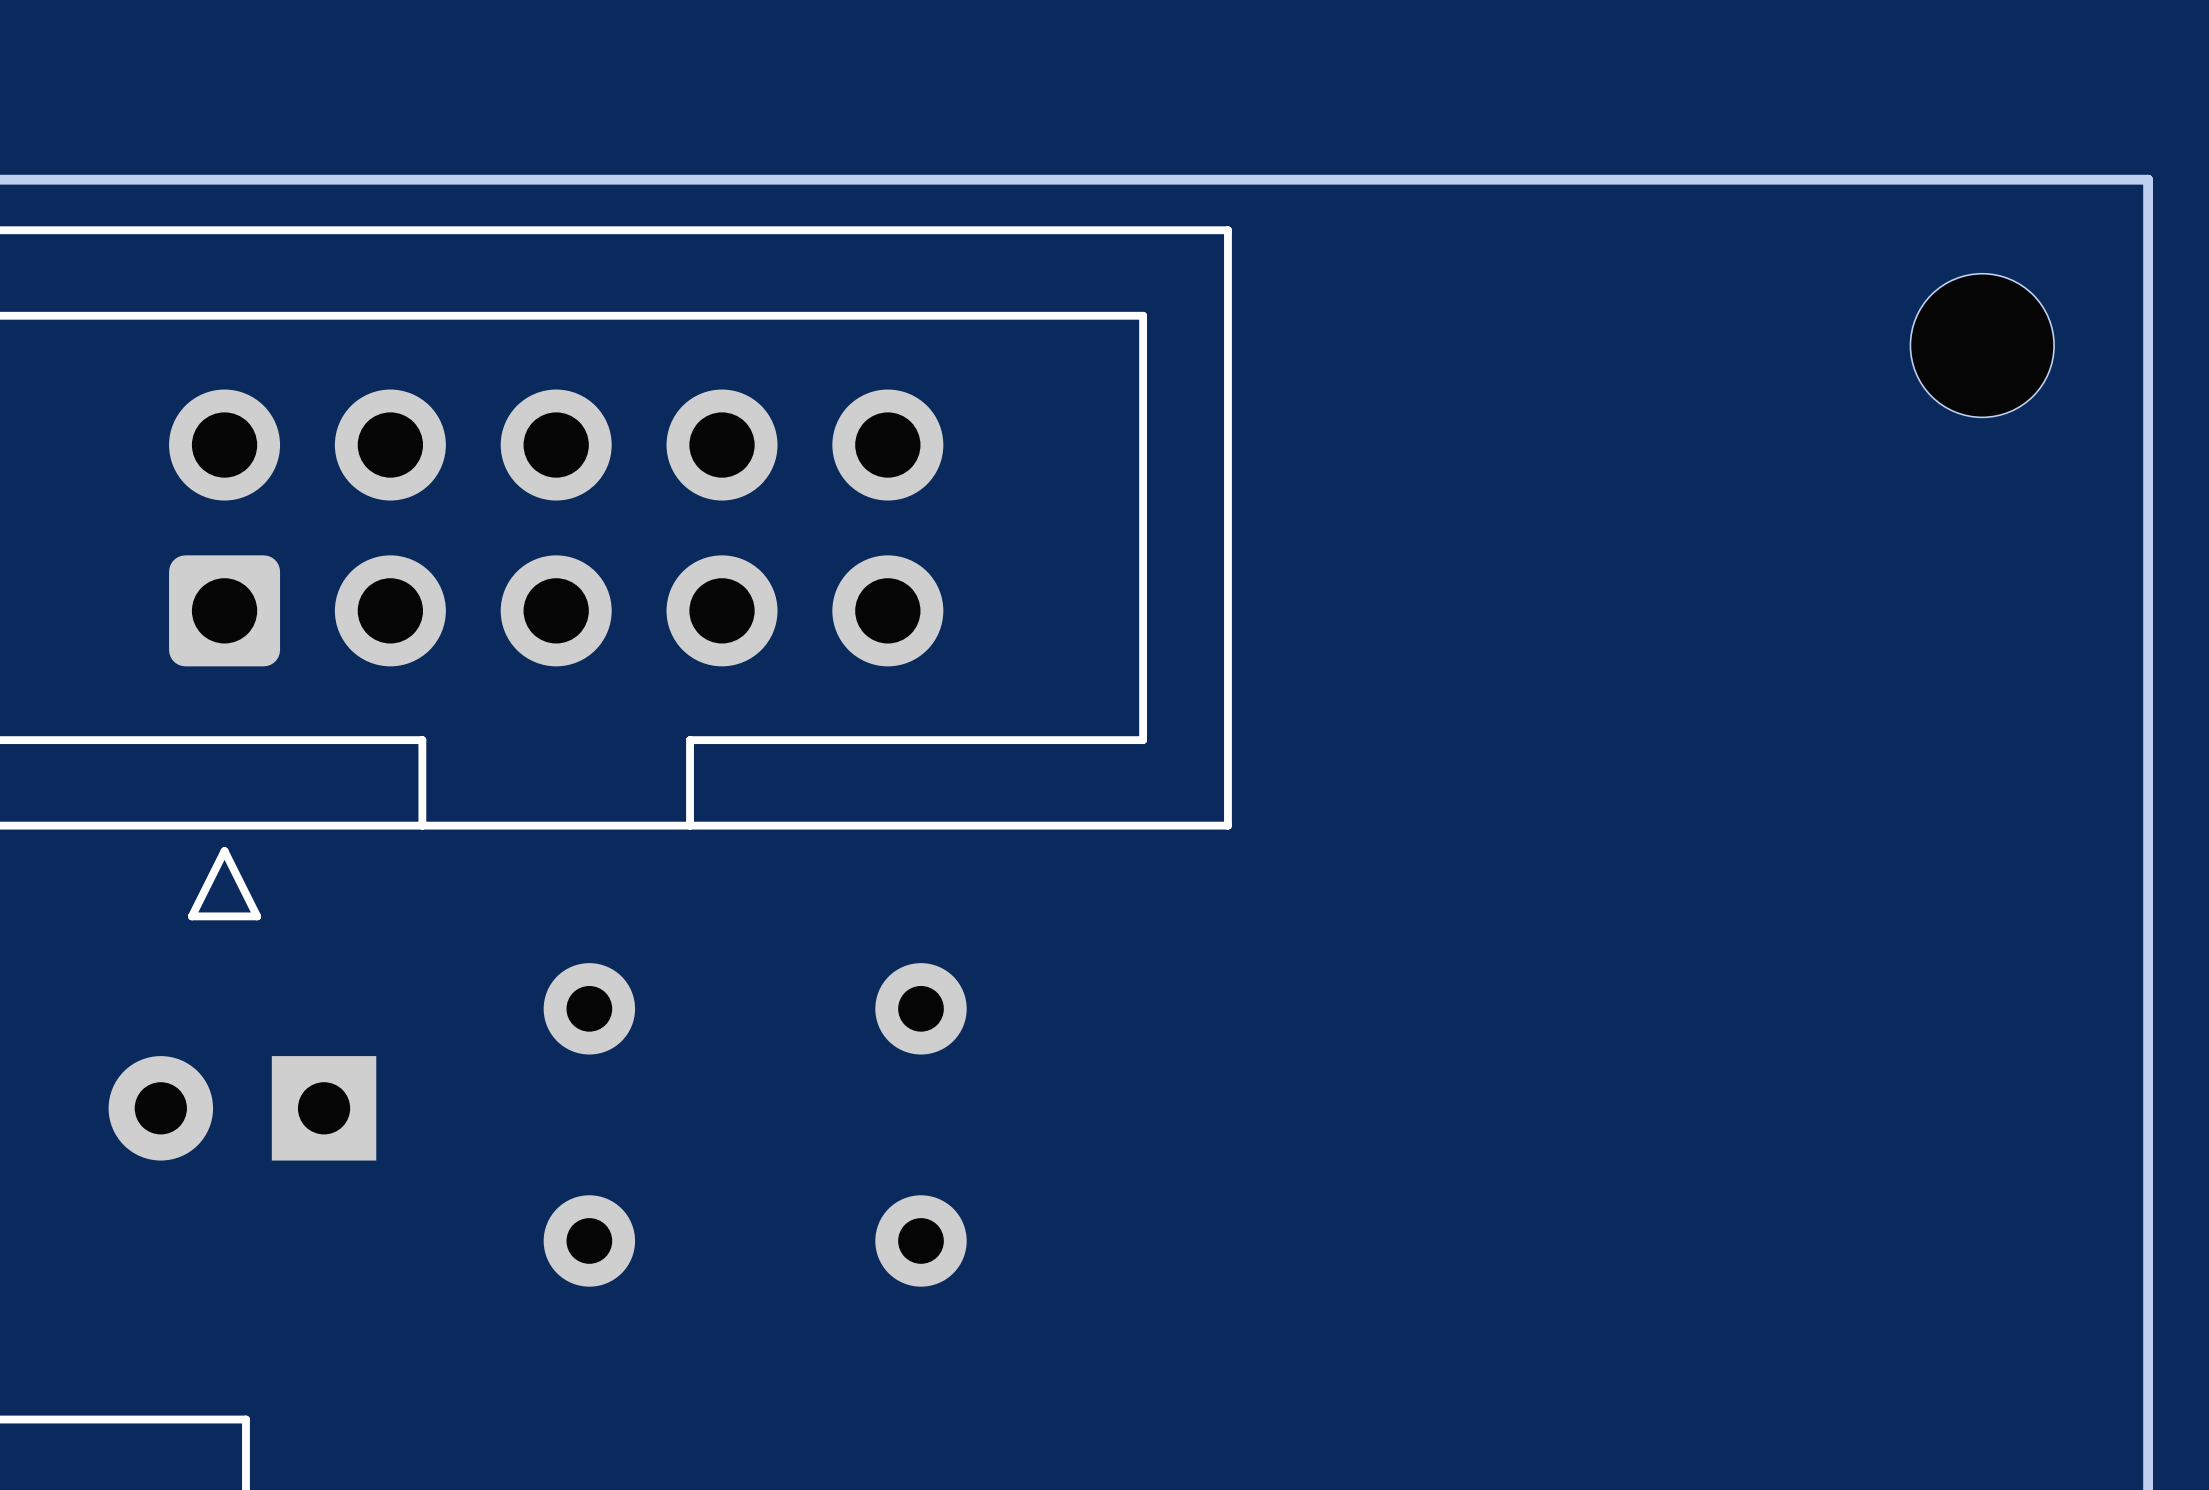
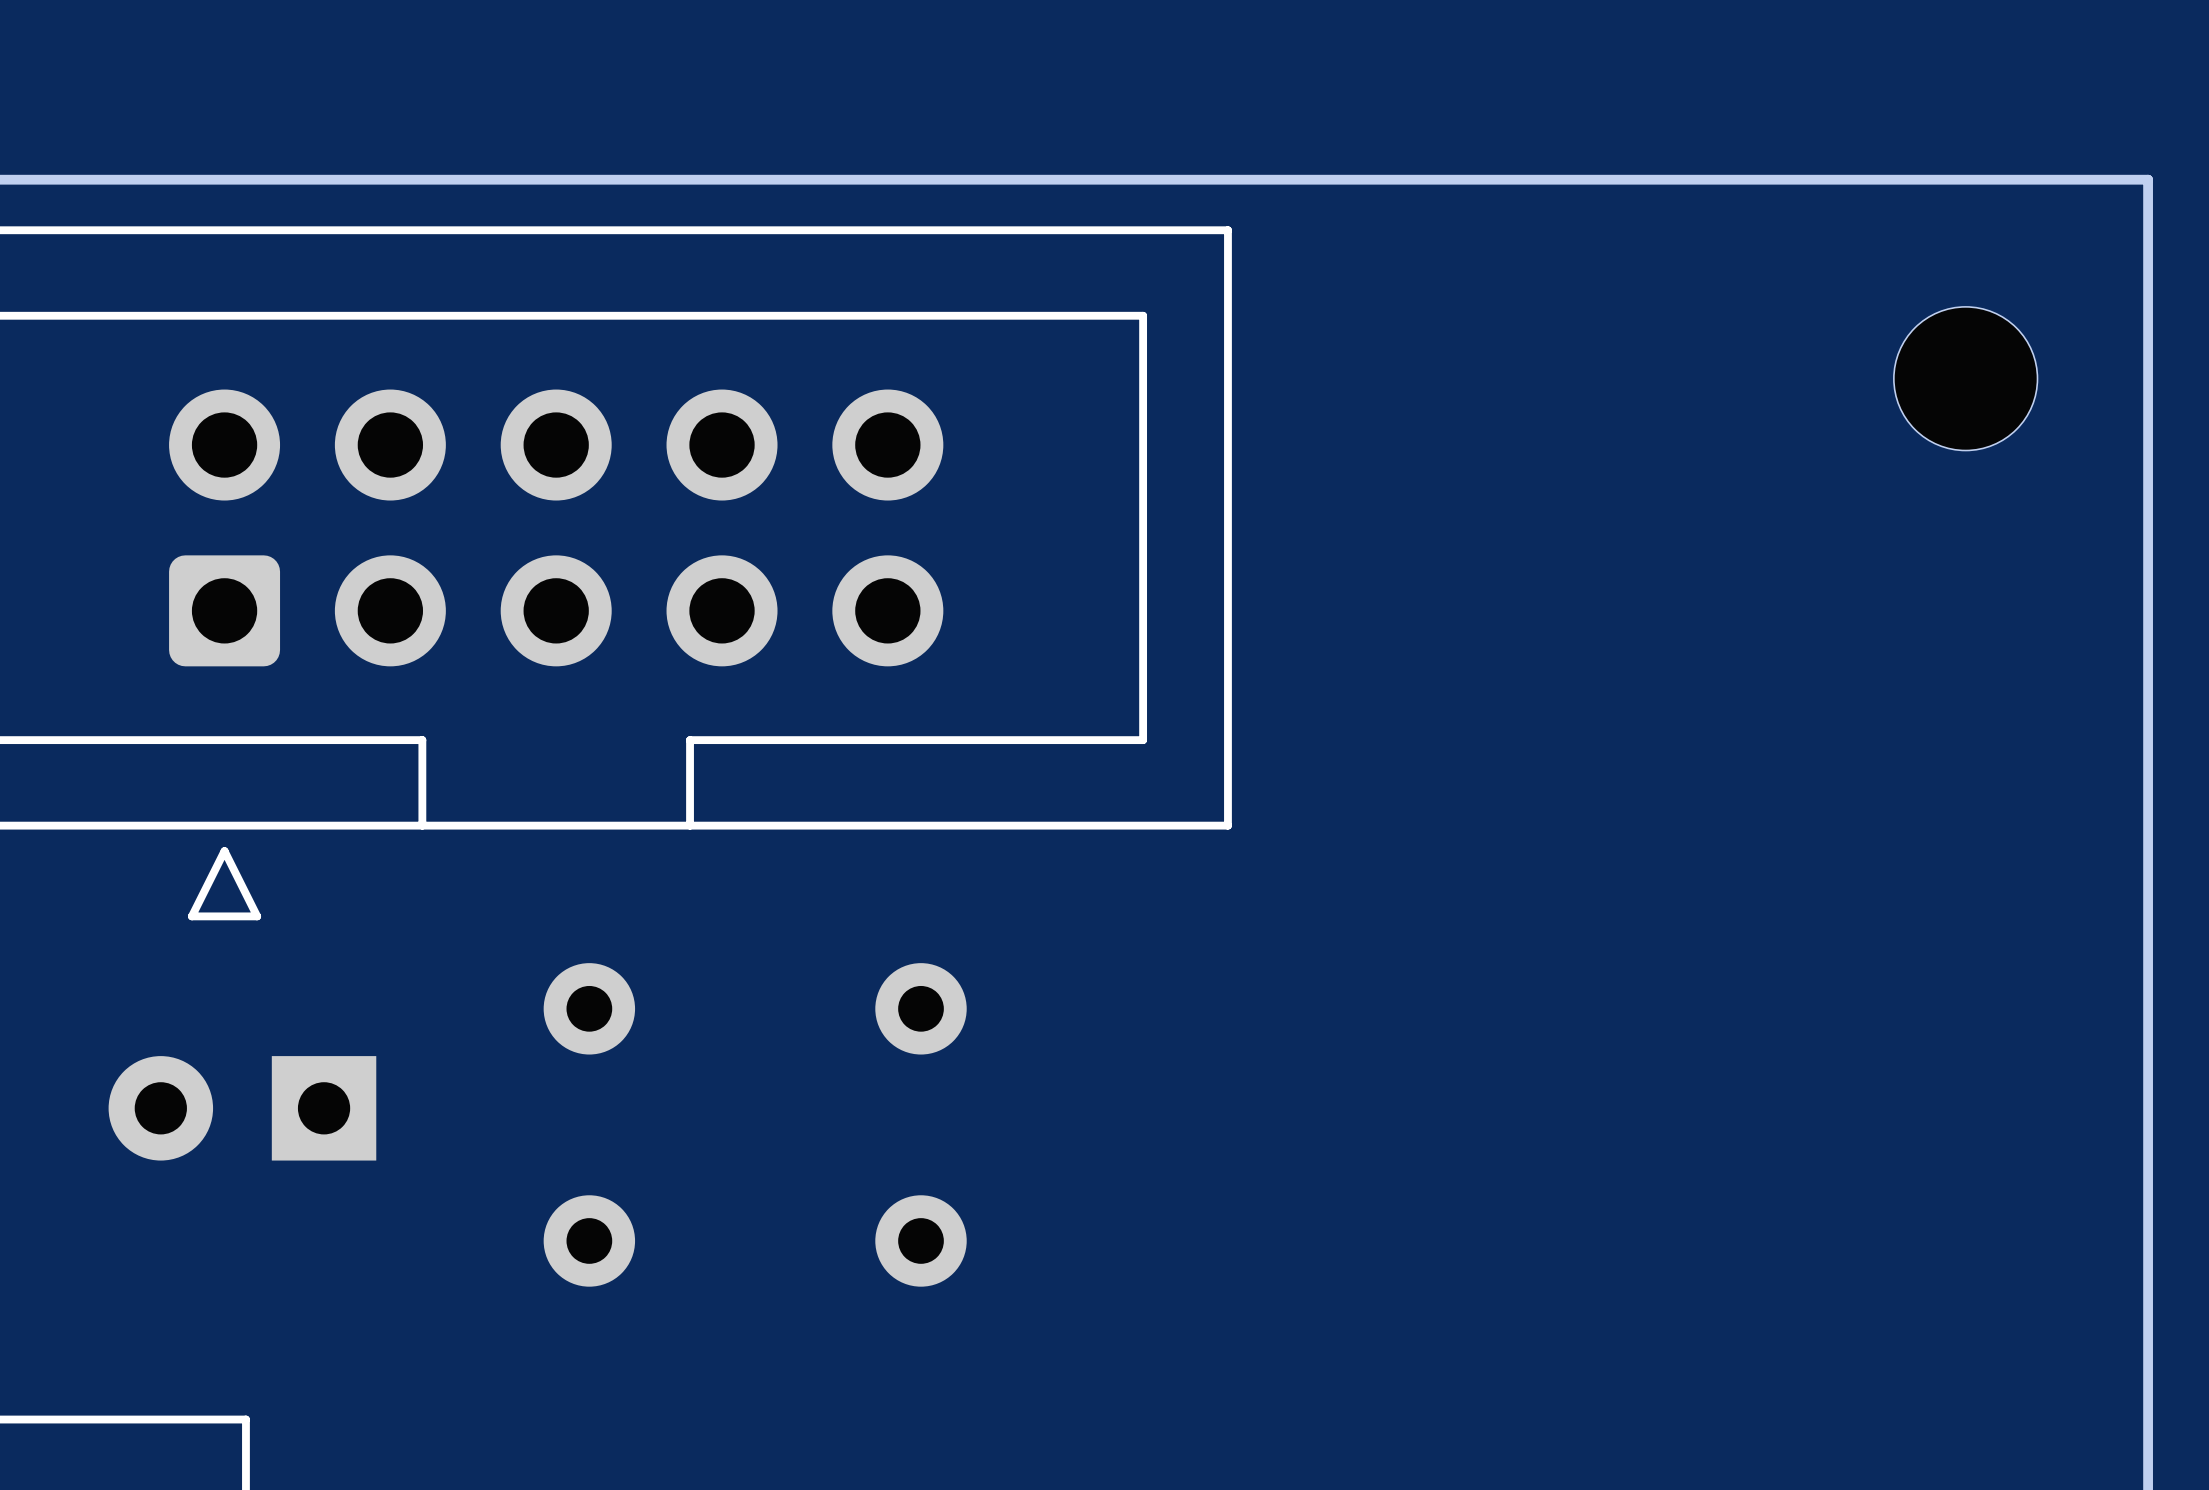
part position: (1982, 345) -> (1965, 378)

